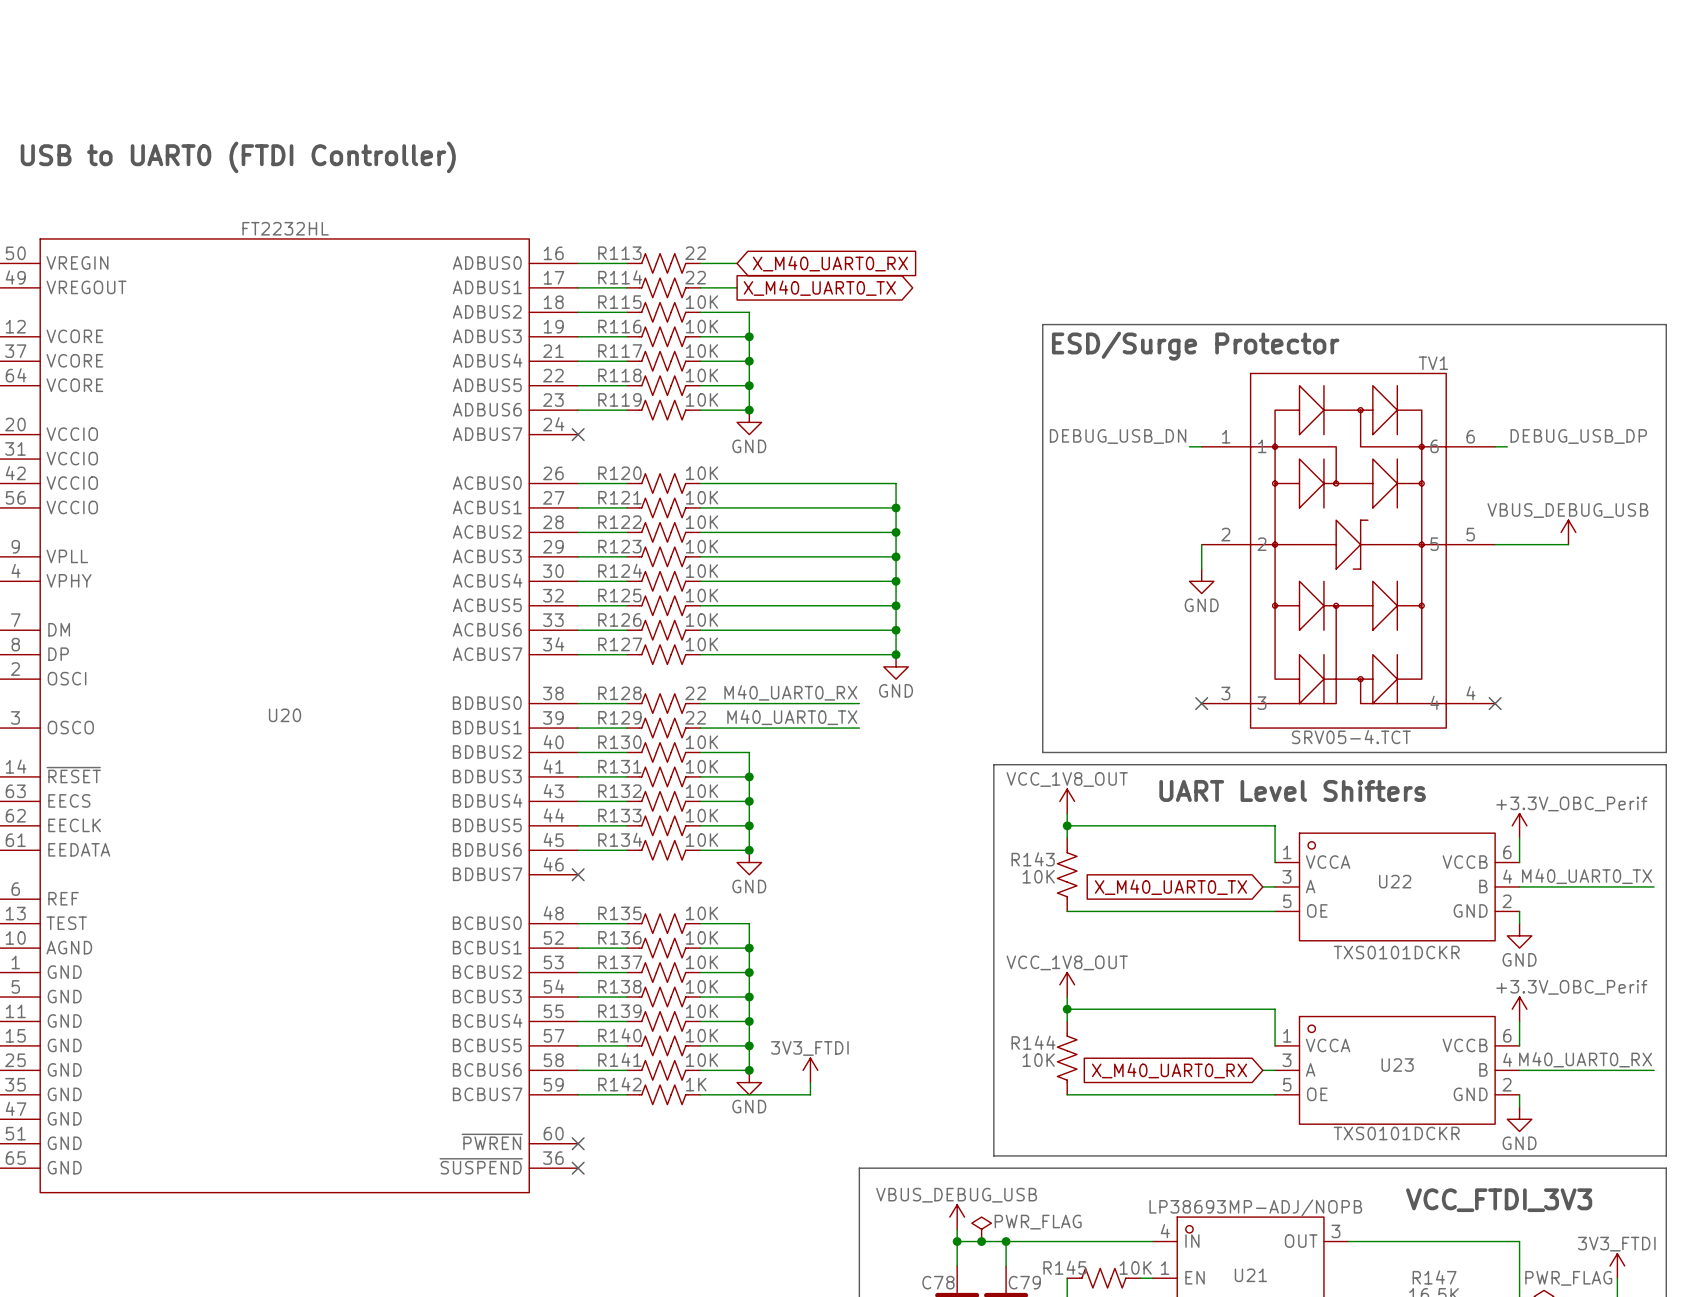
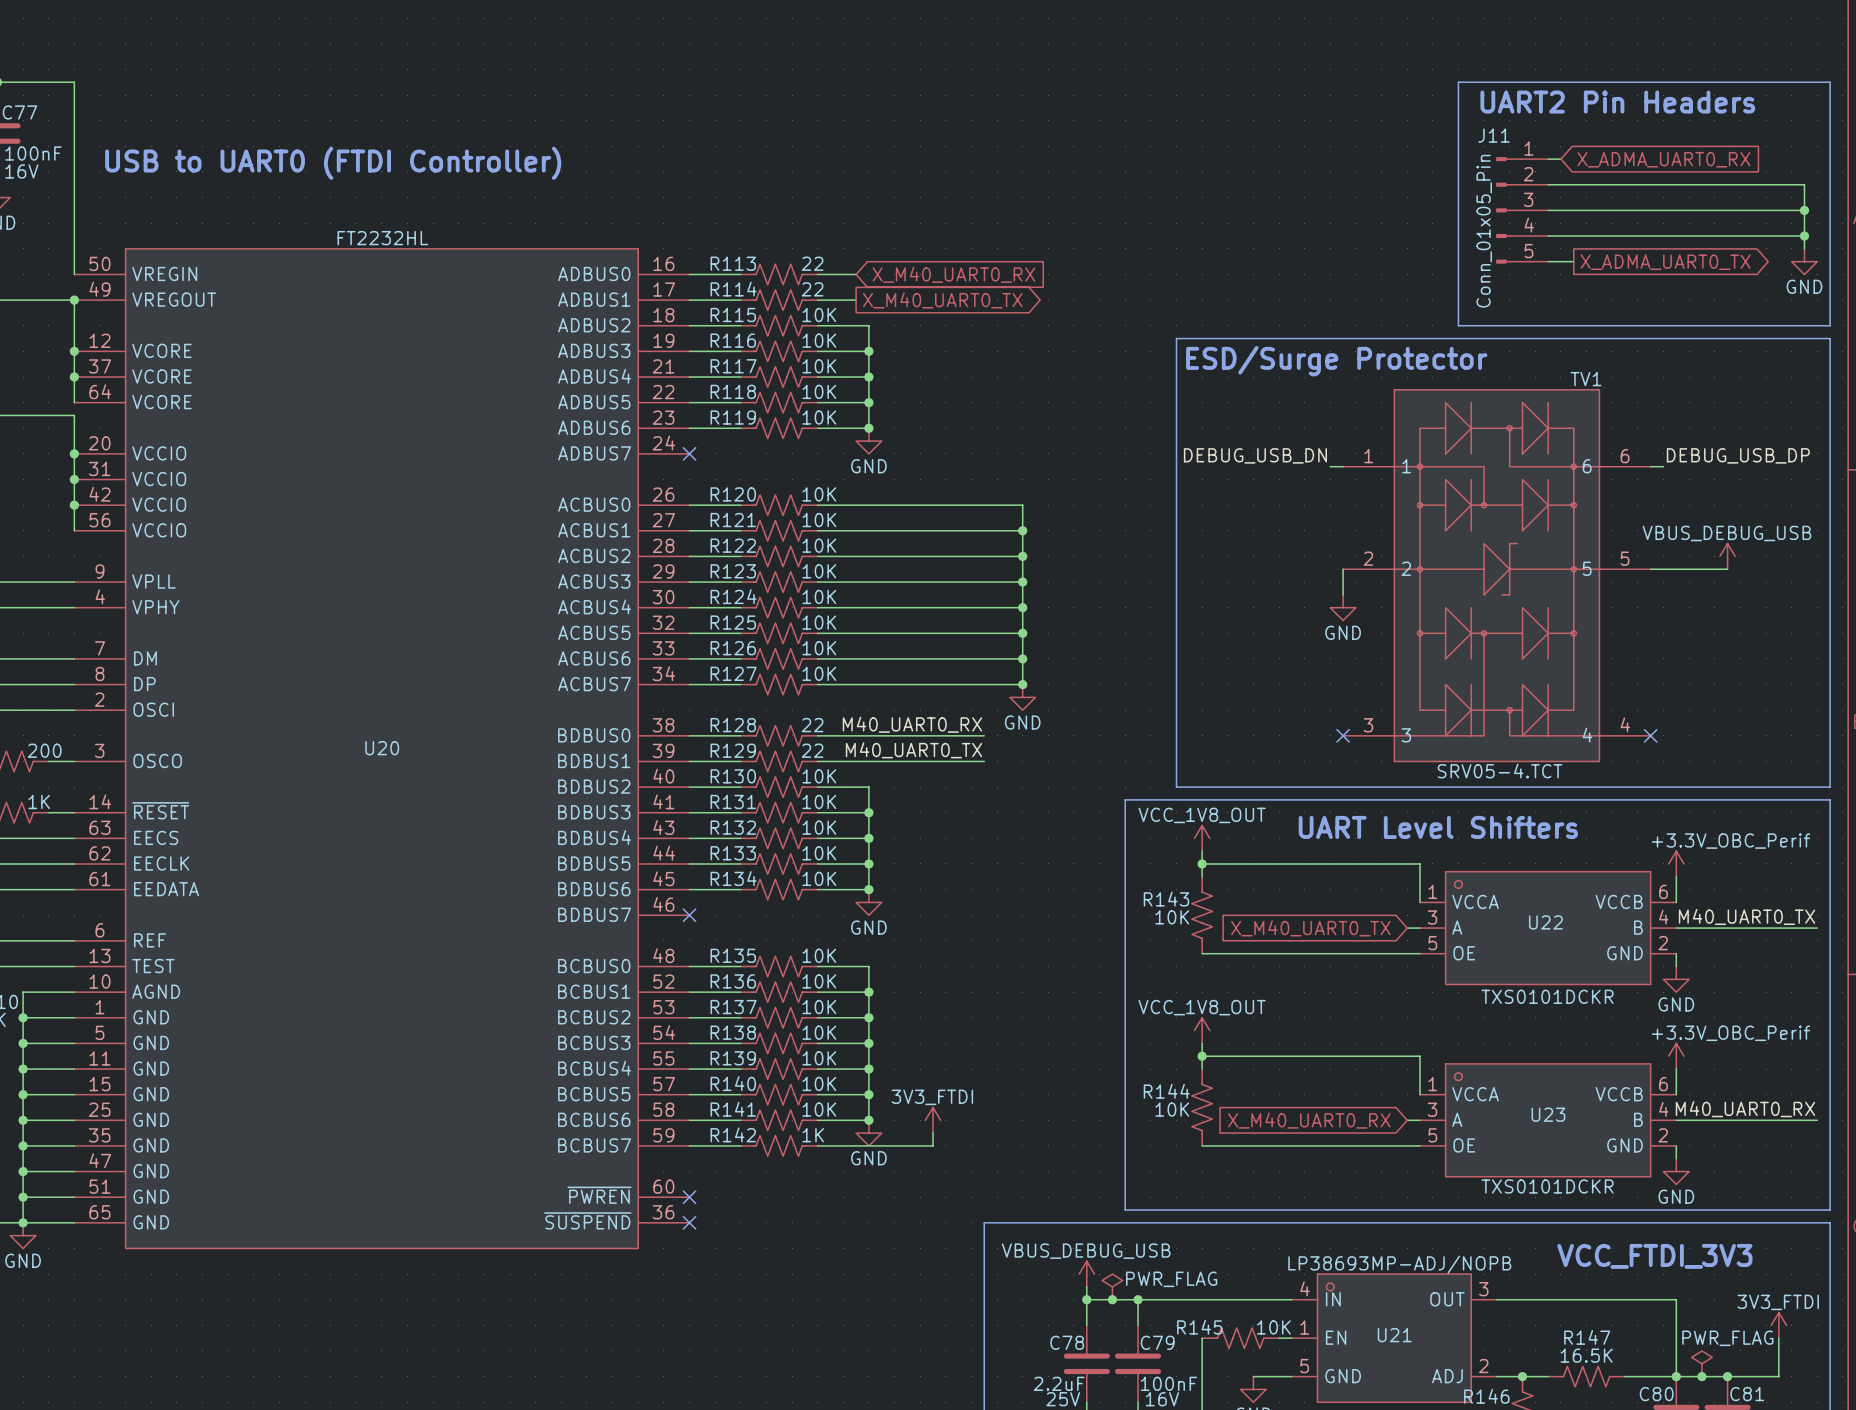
line: none -> (1458, 82) (1830, 82) (1830, 325) (1458, 325) (1458, 82)
text: none -> UART2 Pin Headers (1617, 102)
wire: none -> (1548, 159) (1560, 159)
global label: none -> X_ADMA_UART0_RX (1663, 159)
wire: none -> (1548, 184) (1804, 184) (1804, 248)
J11: none -> Conn_01x05_Pin (1522, 210)
wire: none -> (1548, 210) (1804, 210)
junction: none -> (1804, 210)
wire: none -> (1548, 236) (1804, 236)
junction: none -> (1804, 236)
wire: none -> (1548, 261) (1573, 261)
global label: none -> X_ADMA_UART0_TX (1665, 262)
power symbol: none -> GND (1804, 261)

